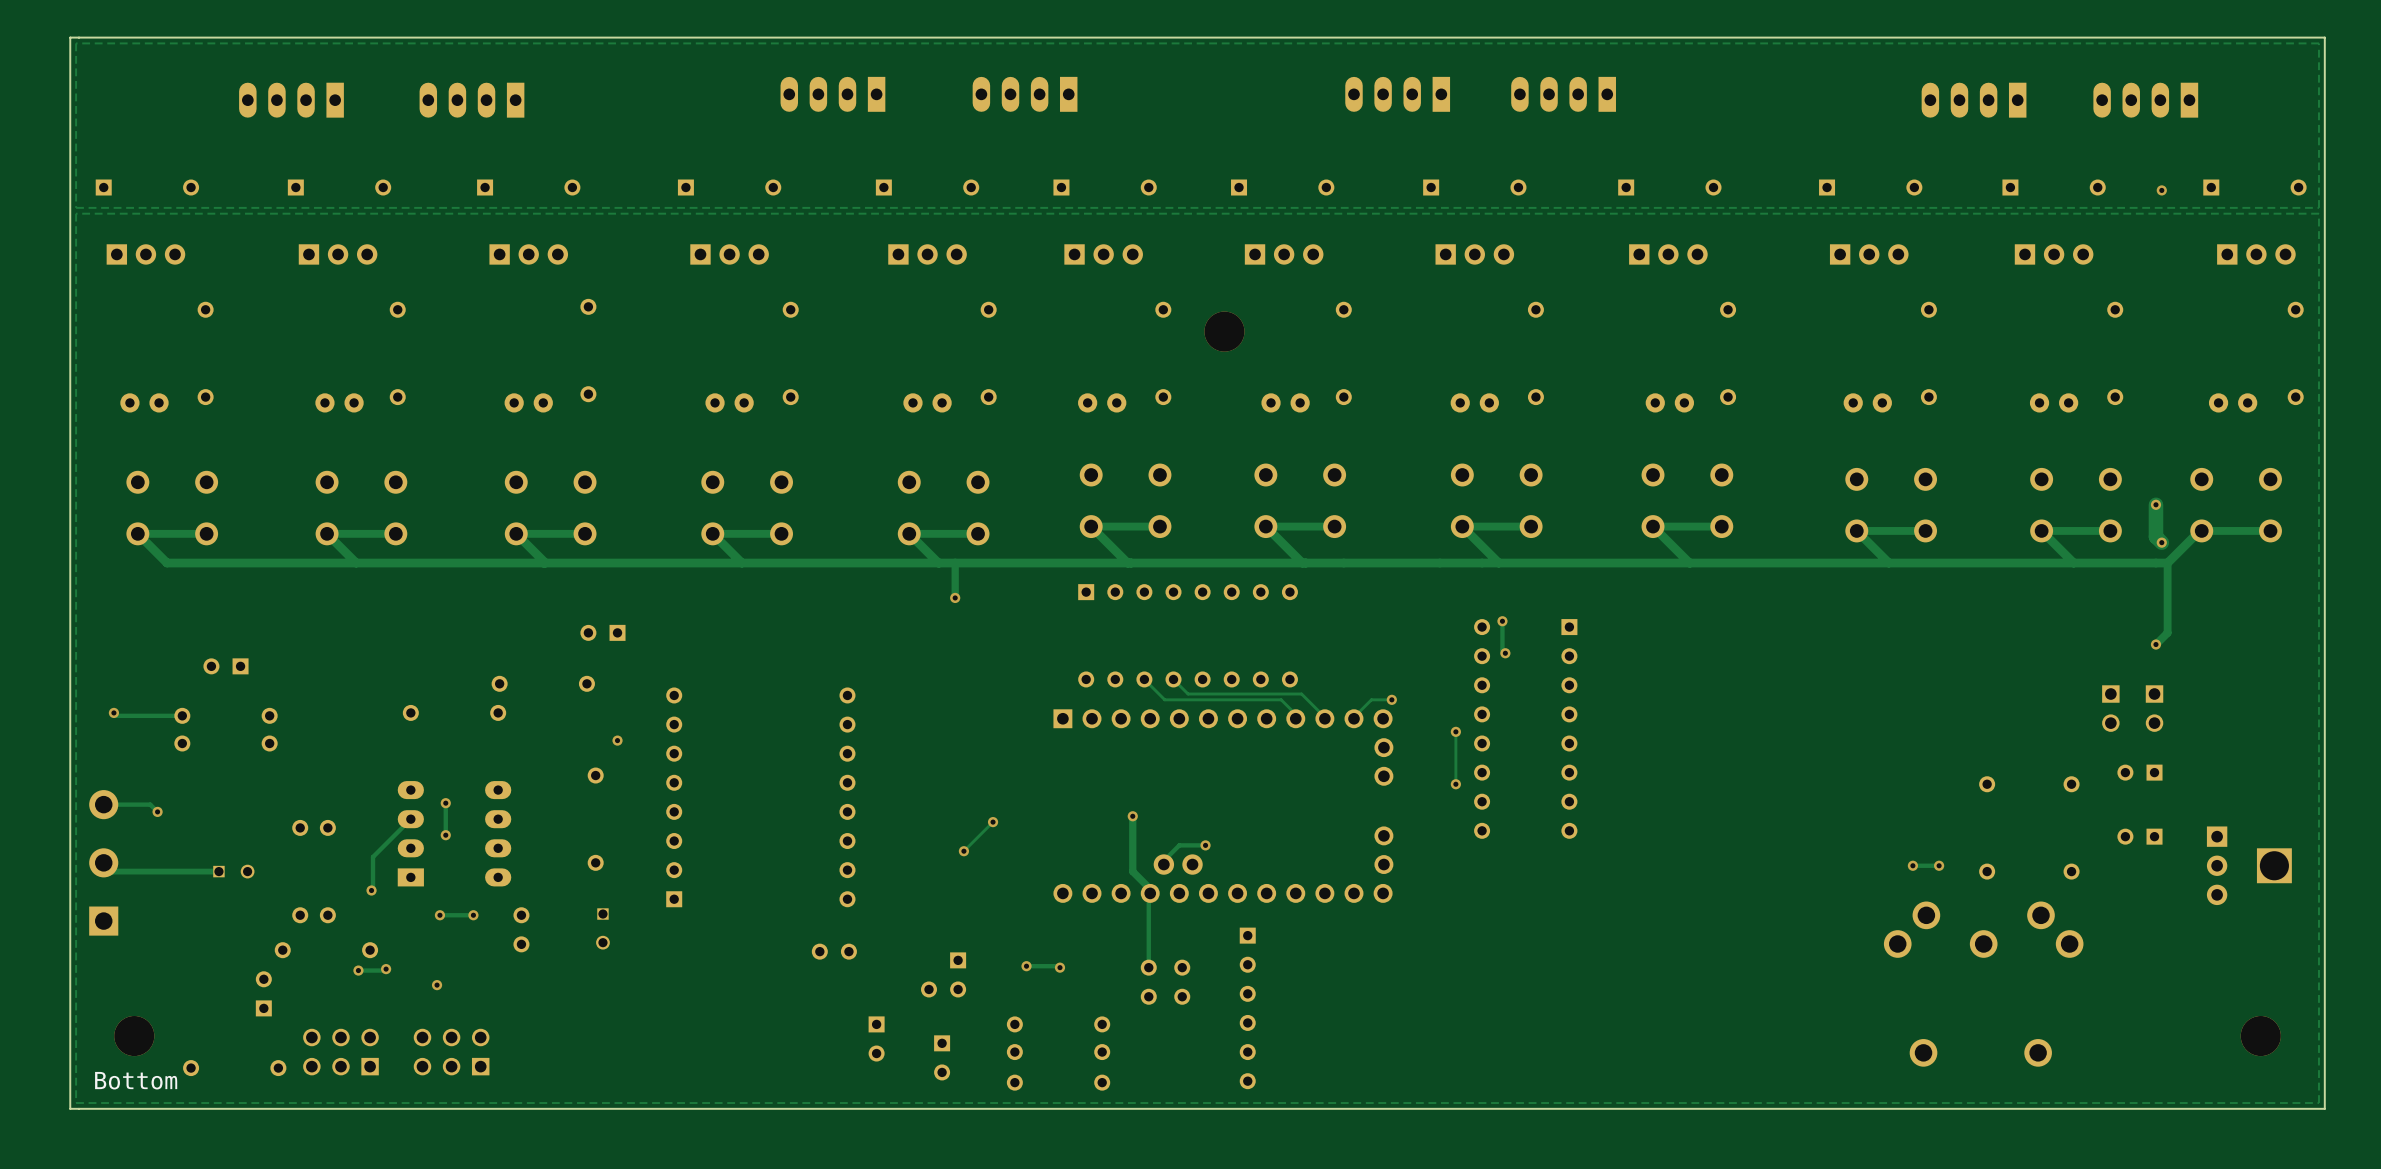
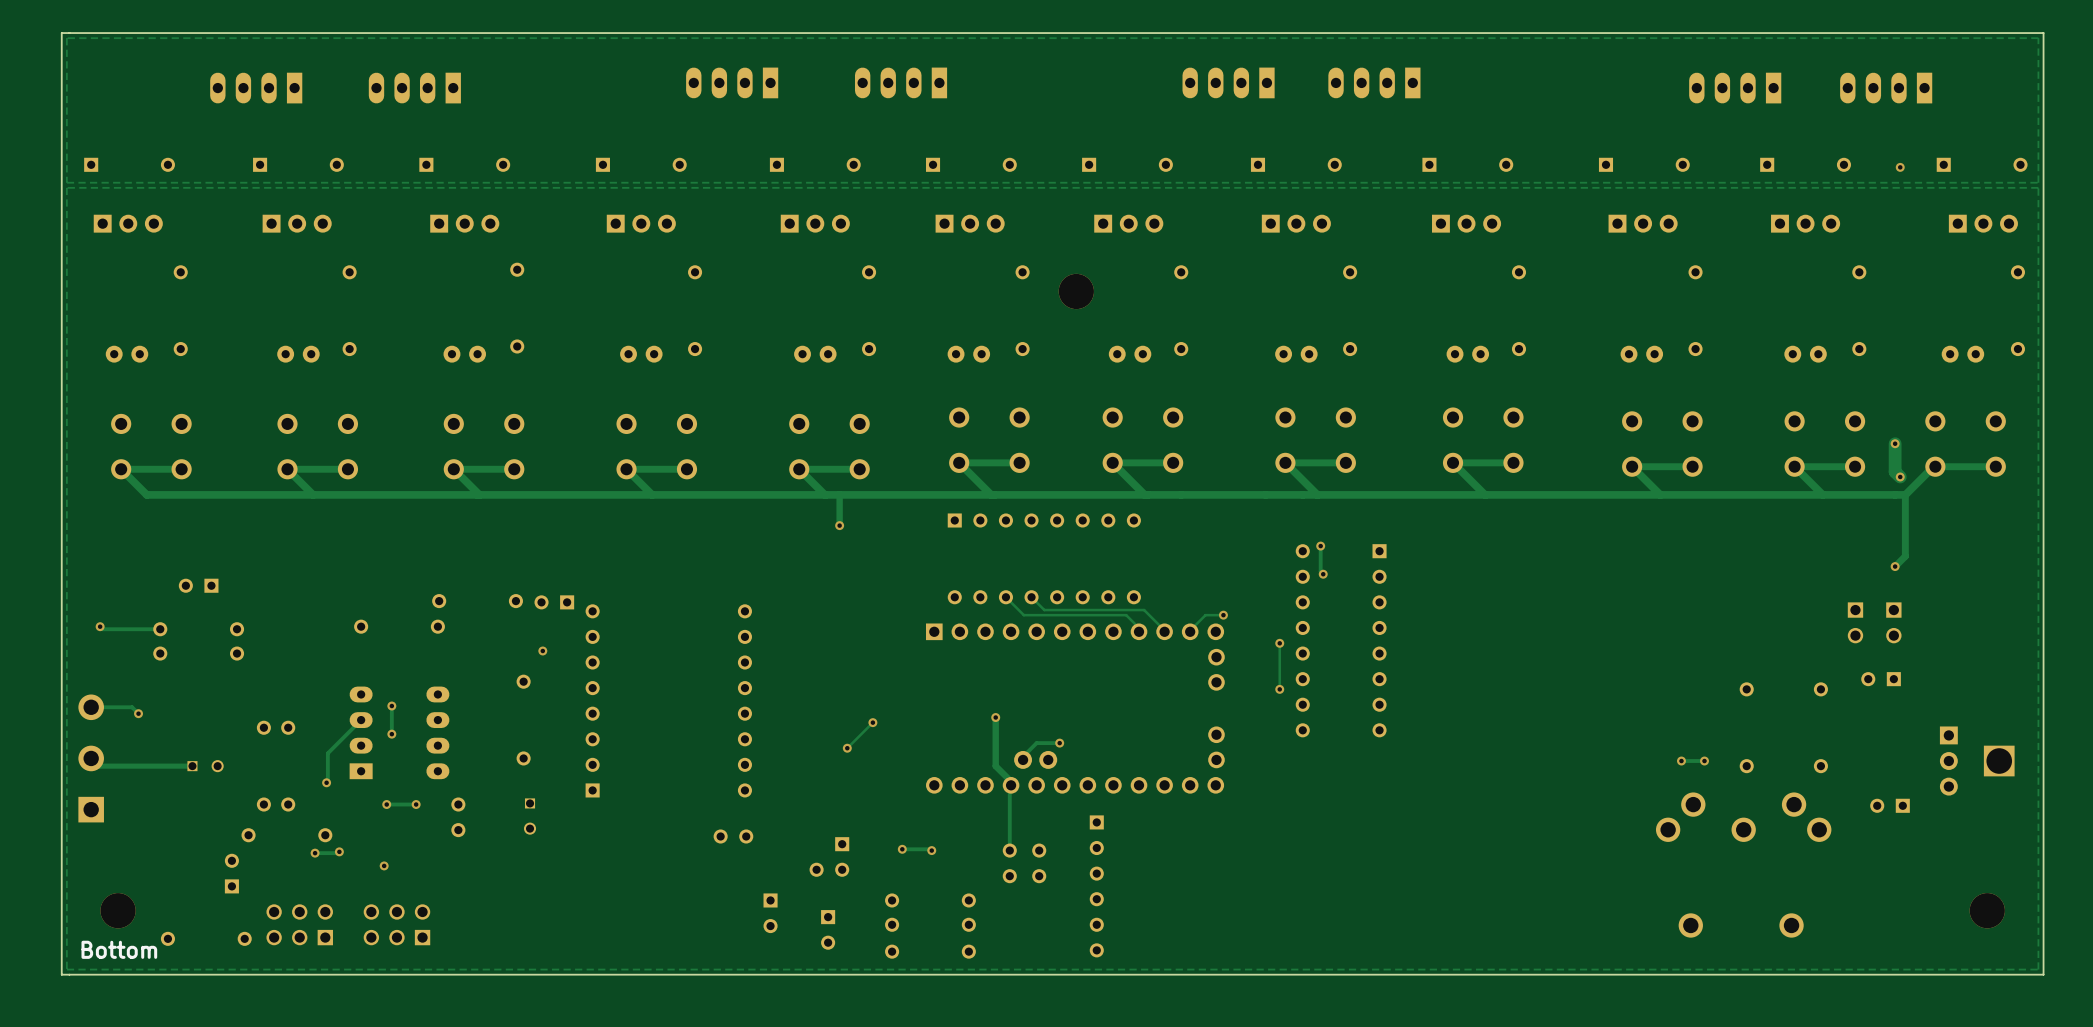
part position: (602, 632) -> (554, 602)
part position: (2139, 836) -> (1890, 805)

